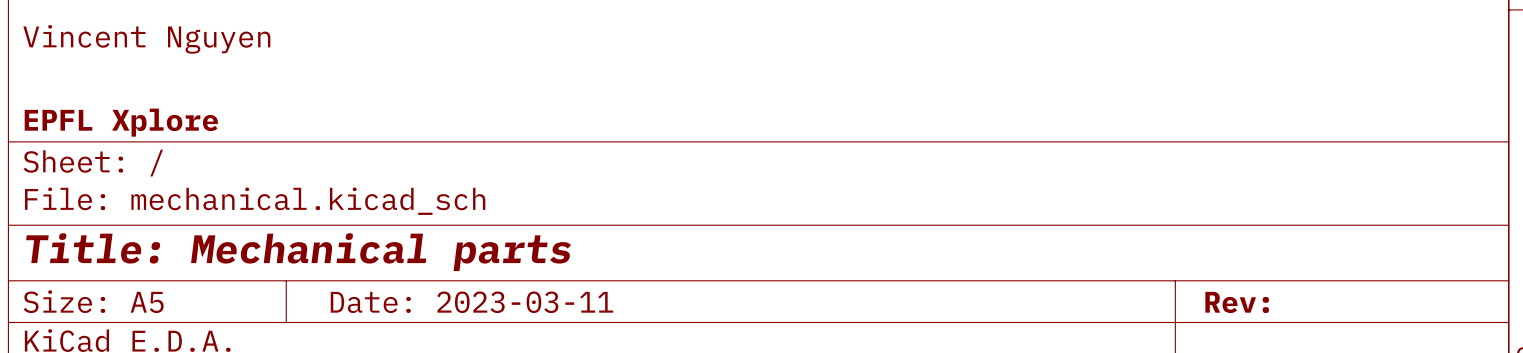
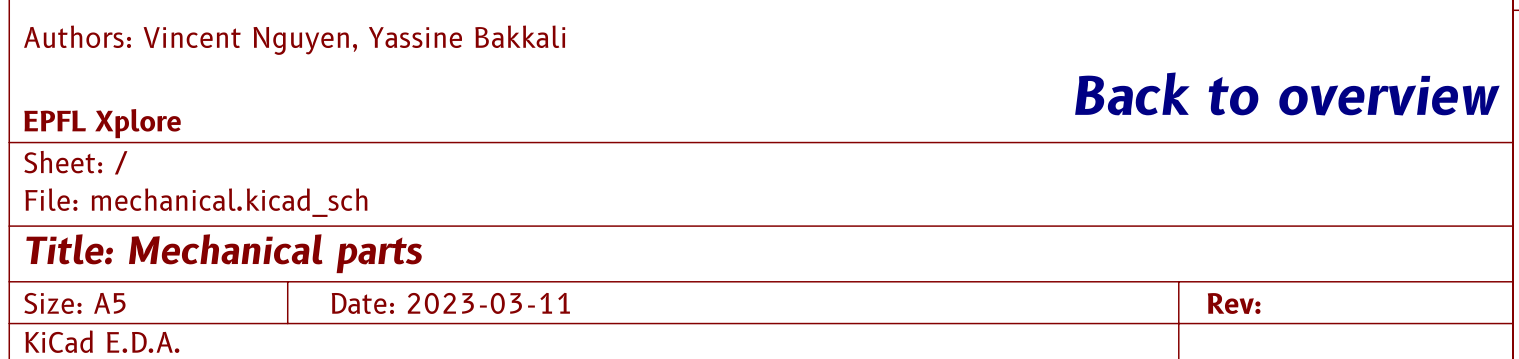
title block: Vincent Nguyen (146, 39) -> Authors: Vincent Nguyen, Yassine Bakkali (294, 40)
text: none -> Back to overview (1287, 93)

